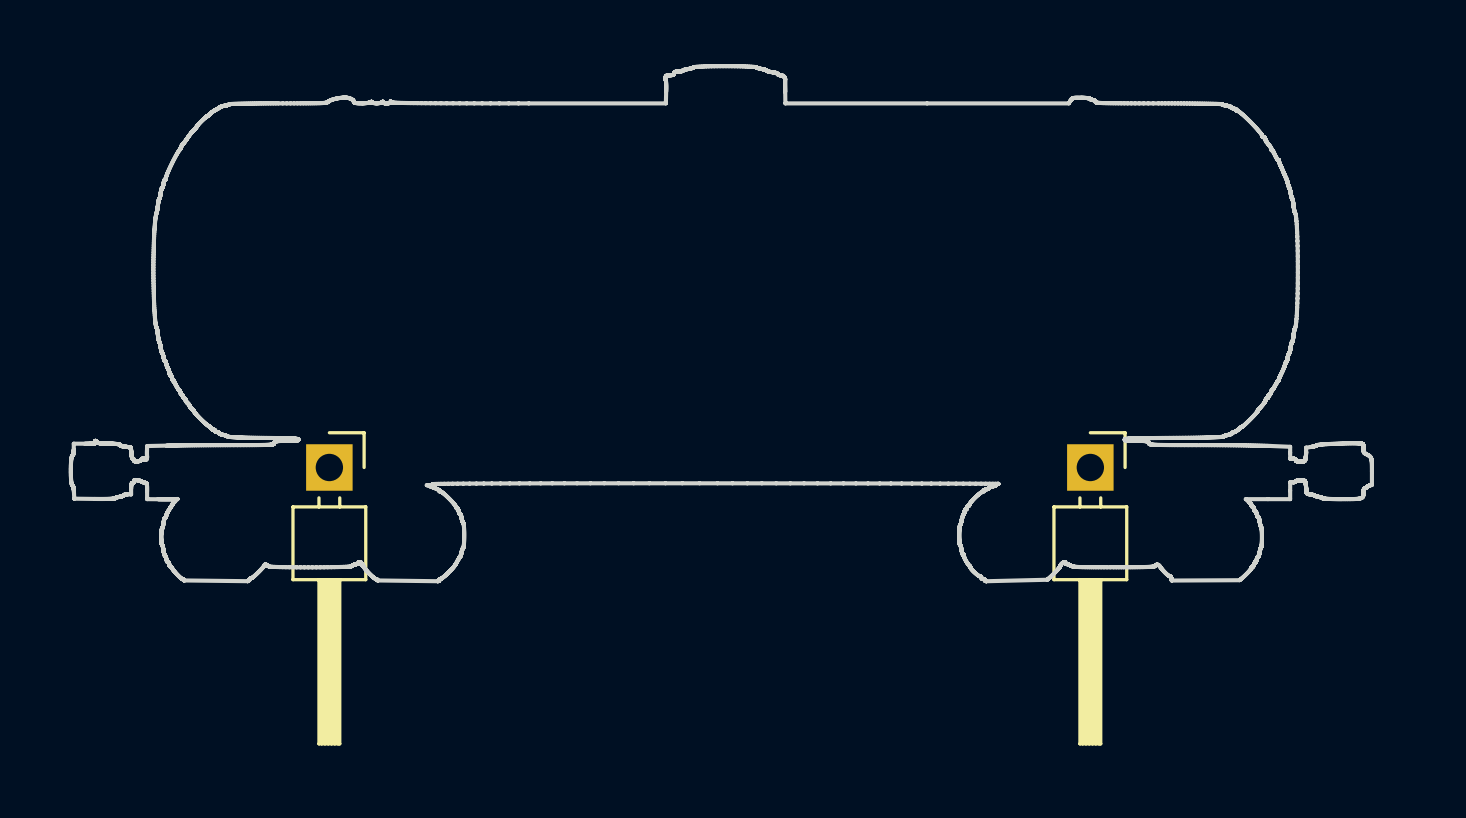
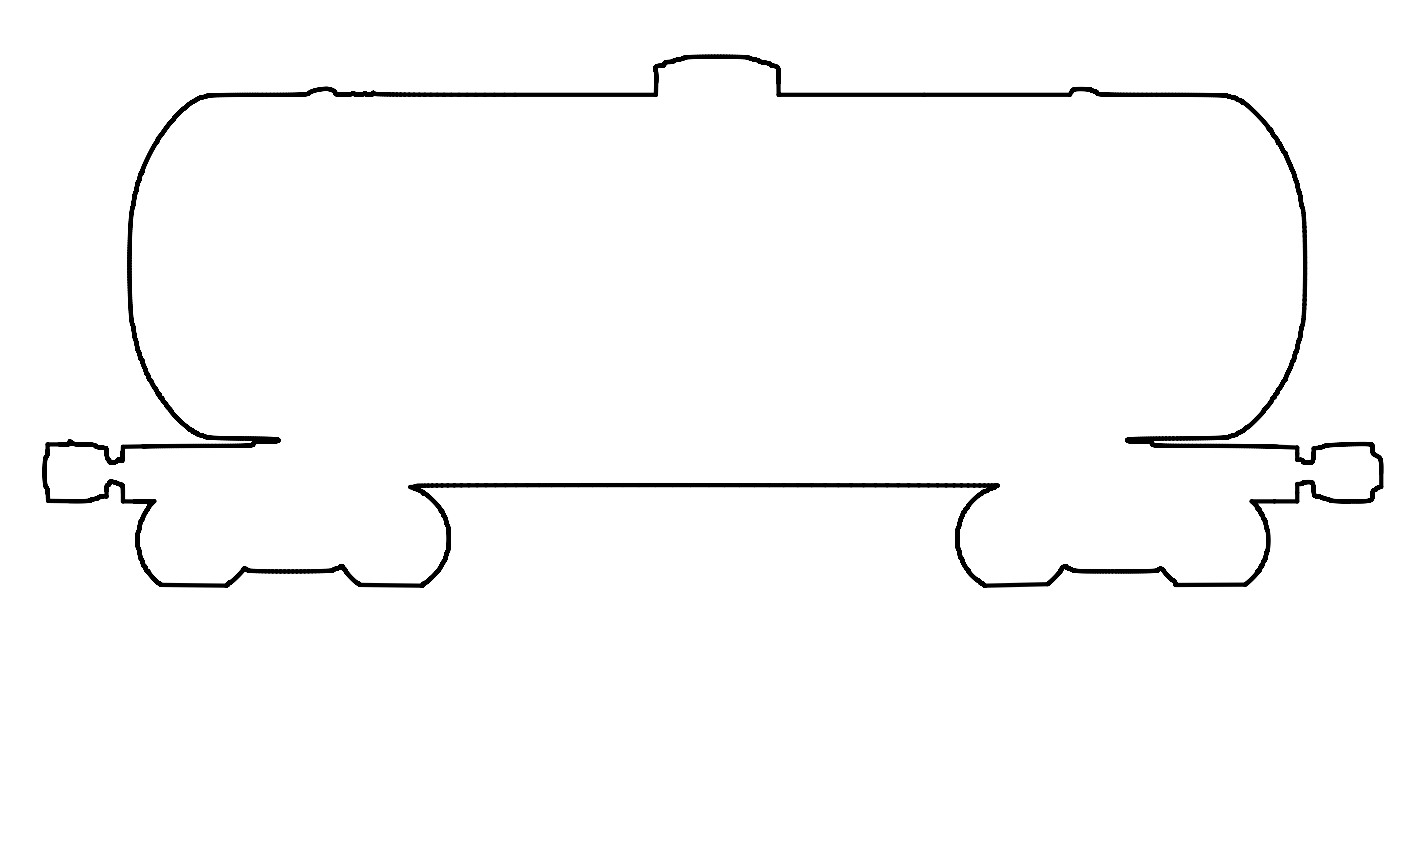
part: (329, 588) -> none
part: (1090, 588) -> none

